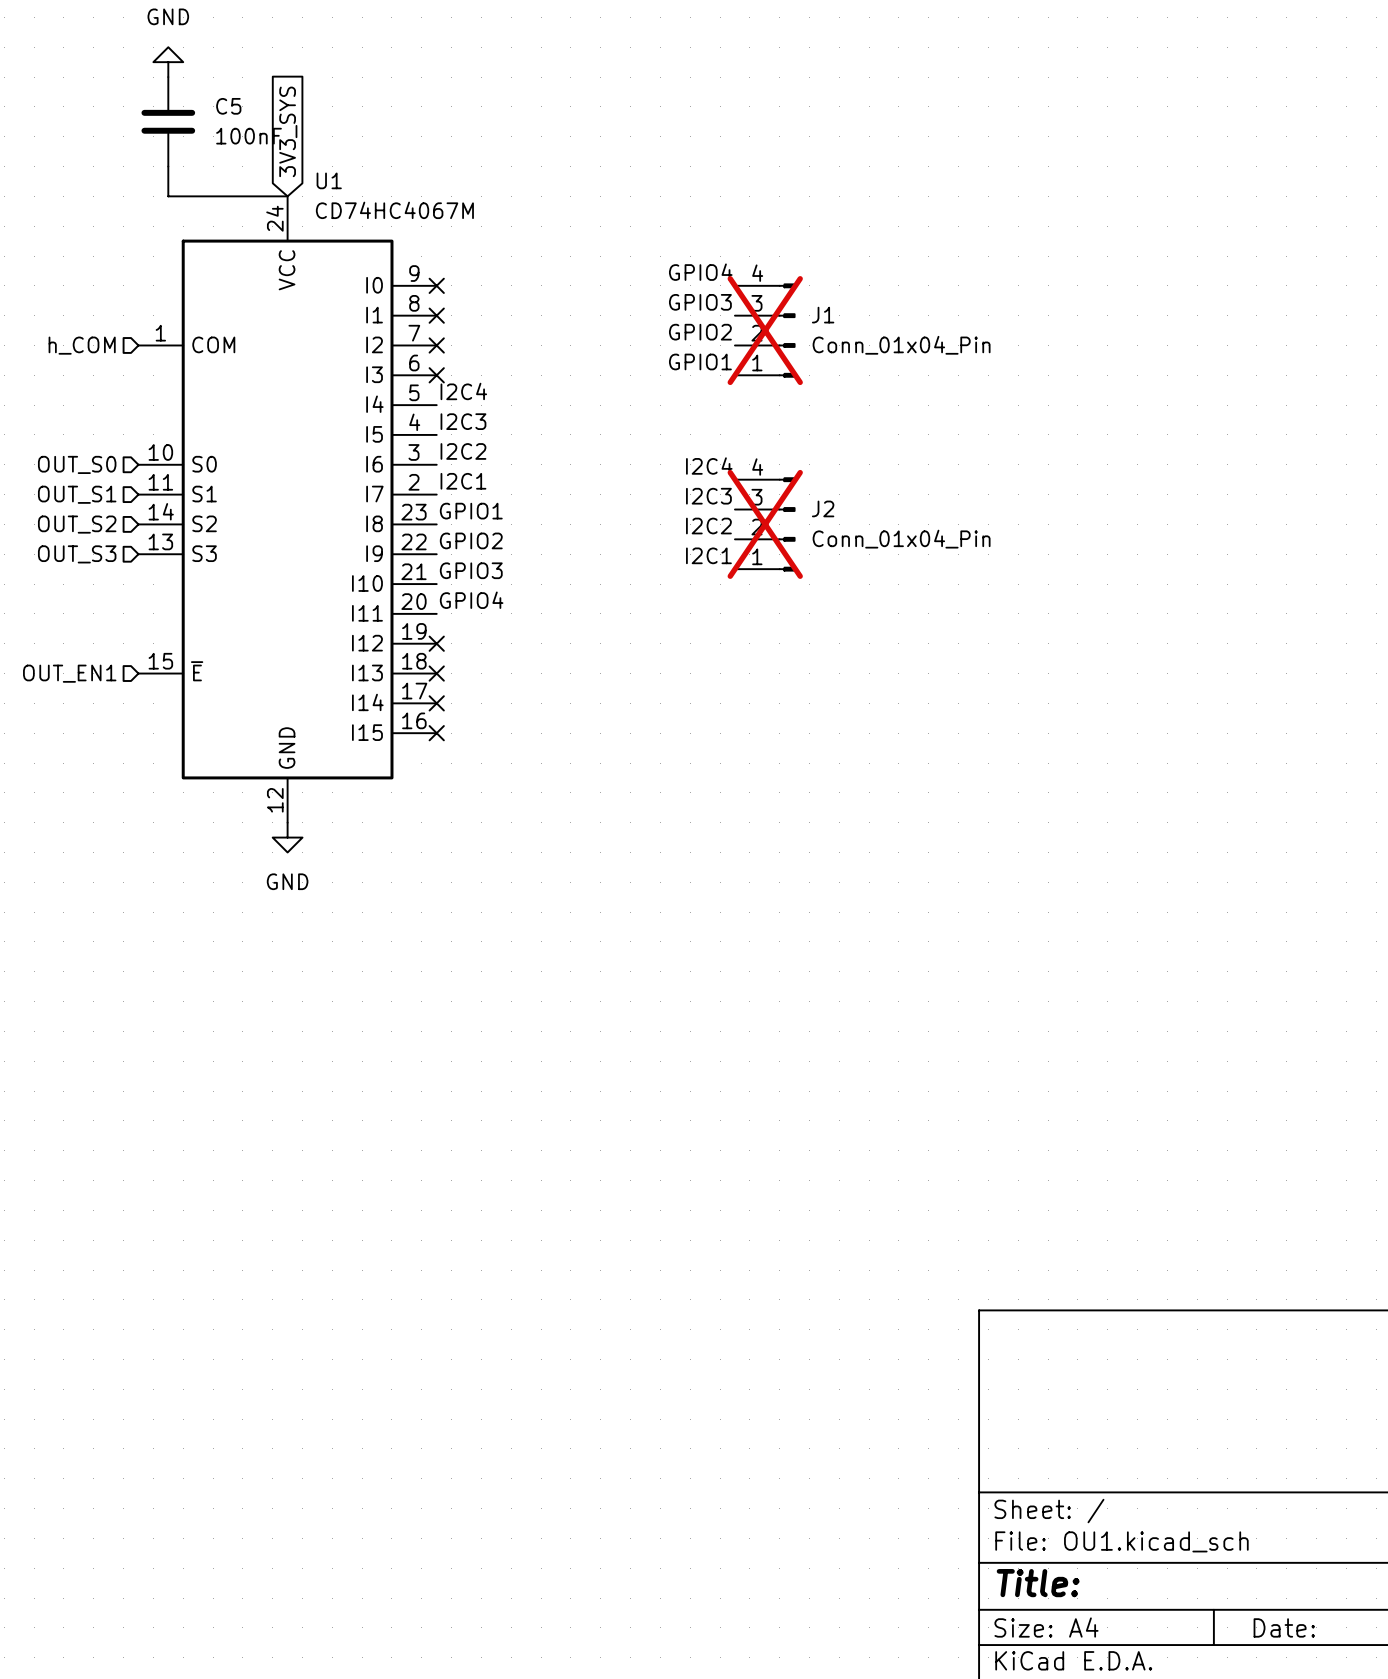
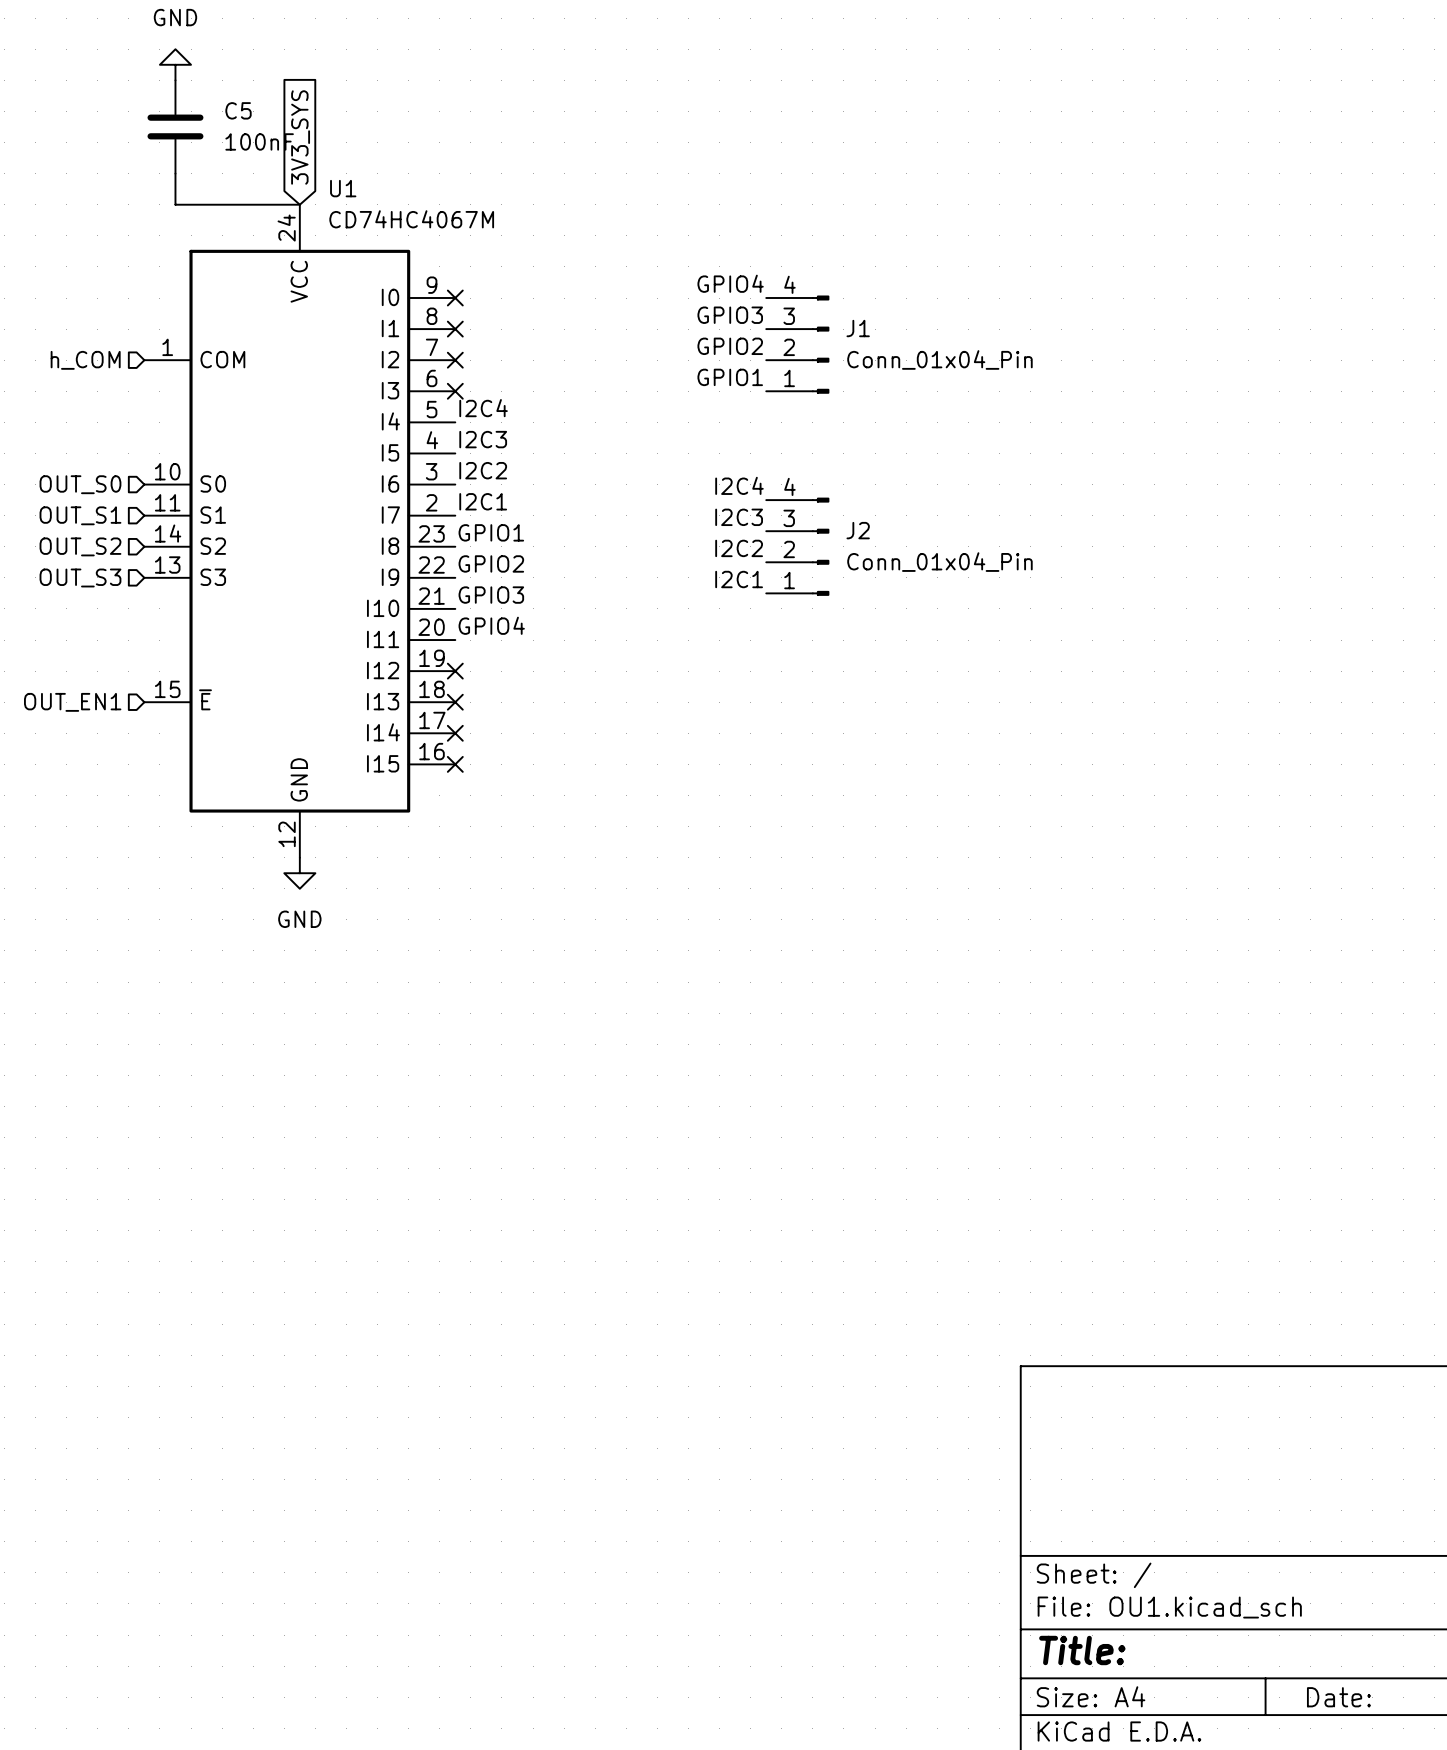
J1 do-not-place cross: (765, 330) -> none
J2 do-not-place cross: (765, 524) -> none

